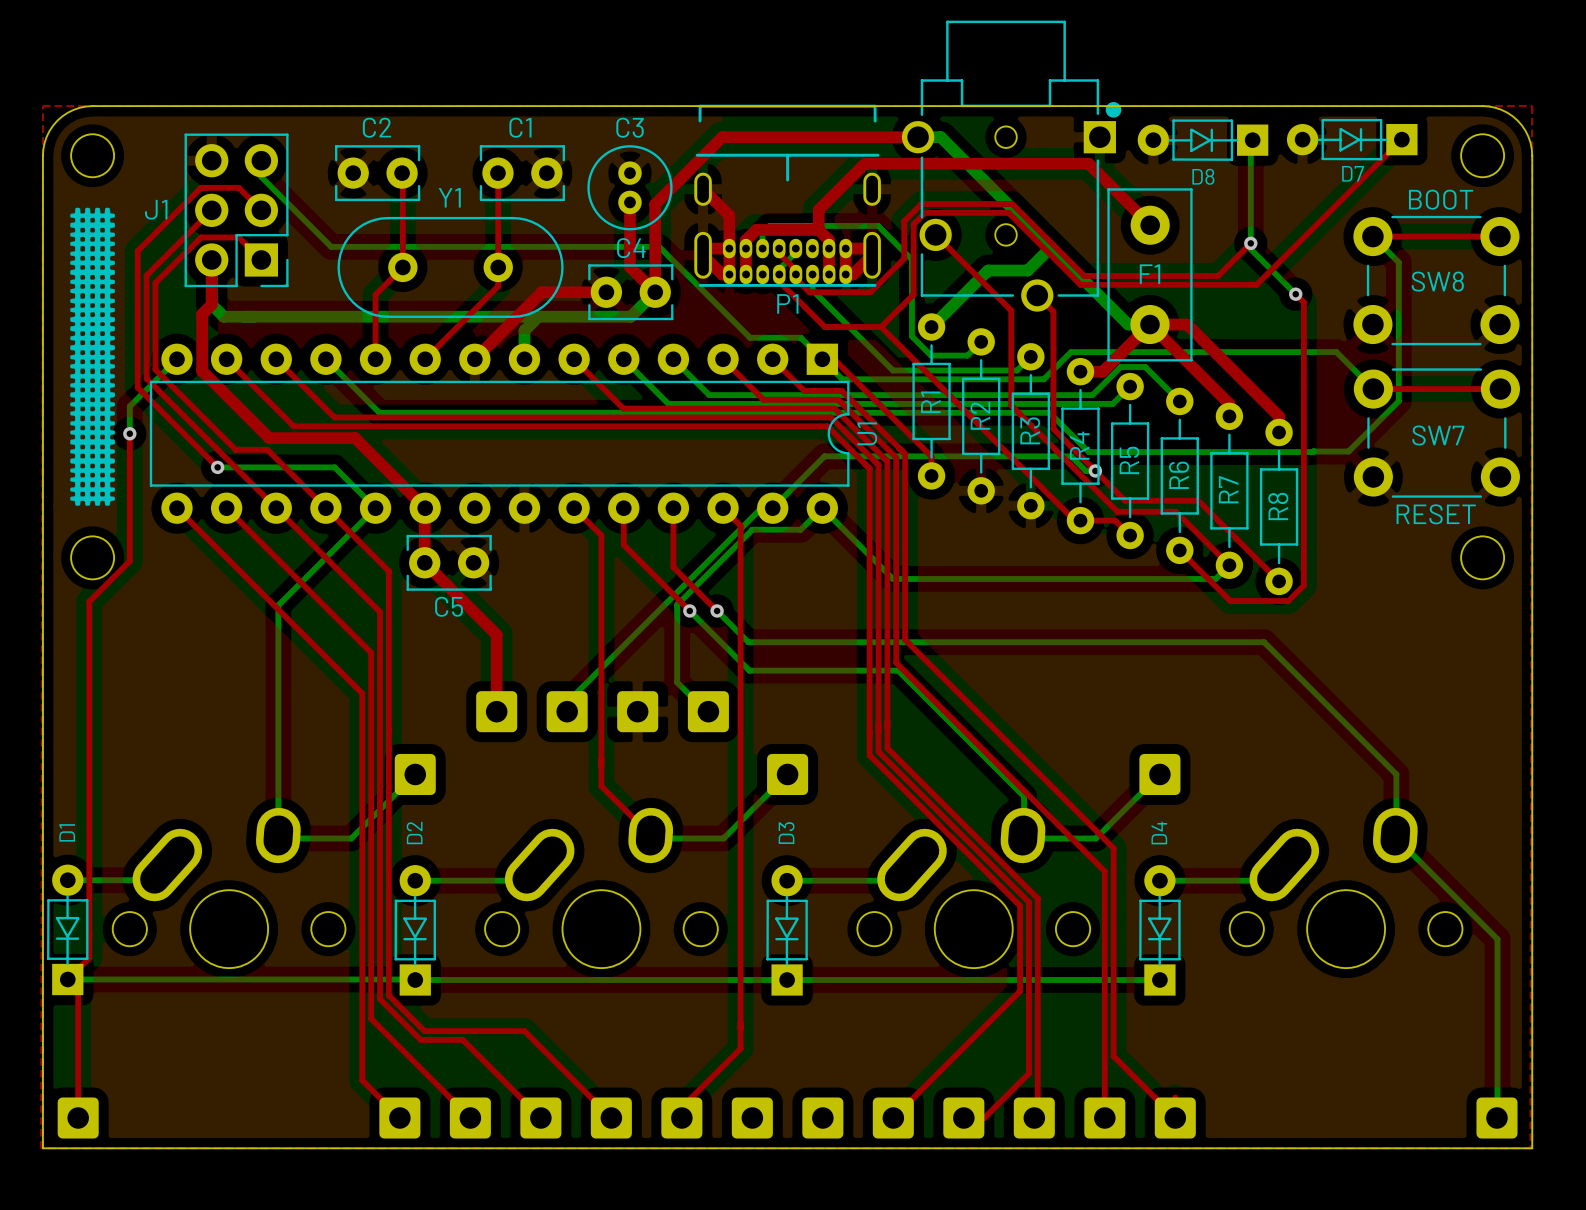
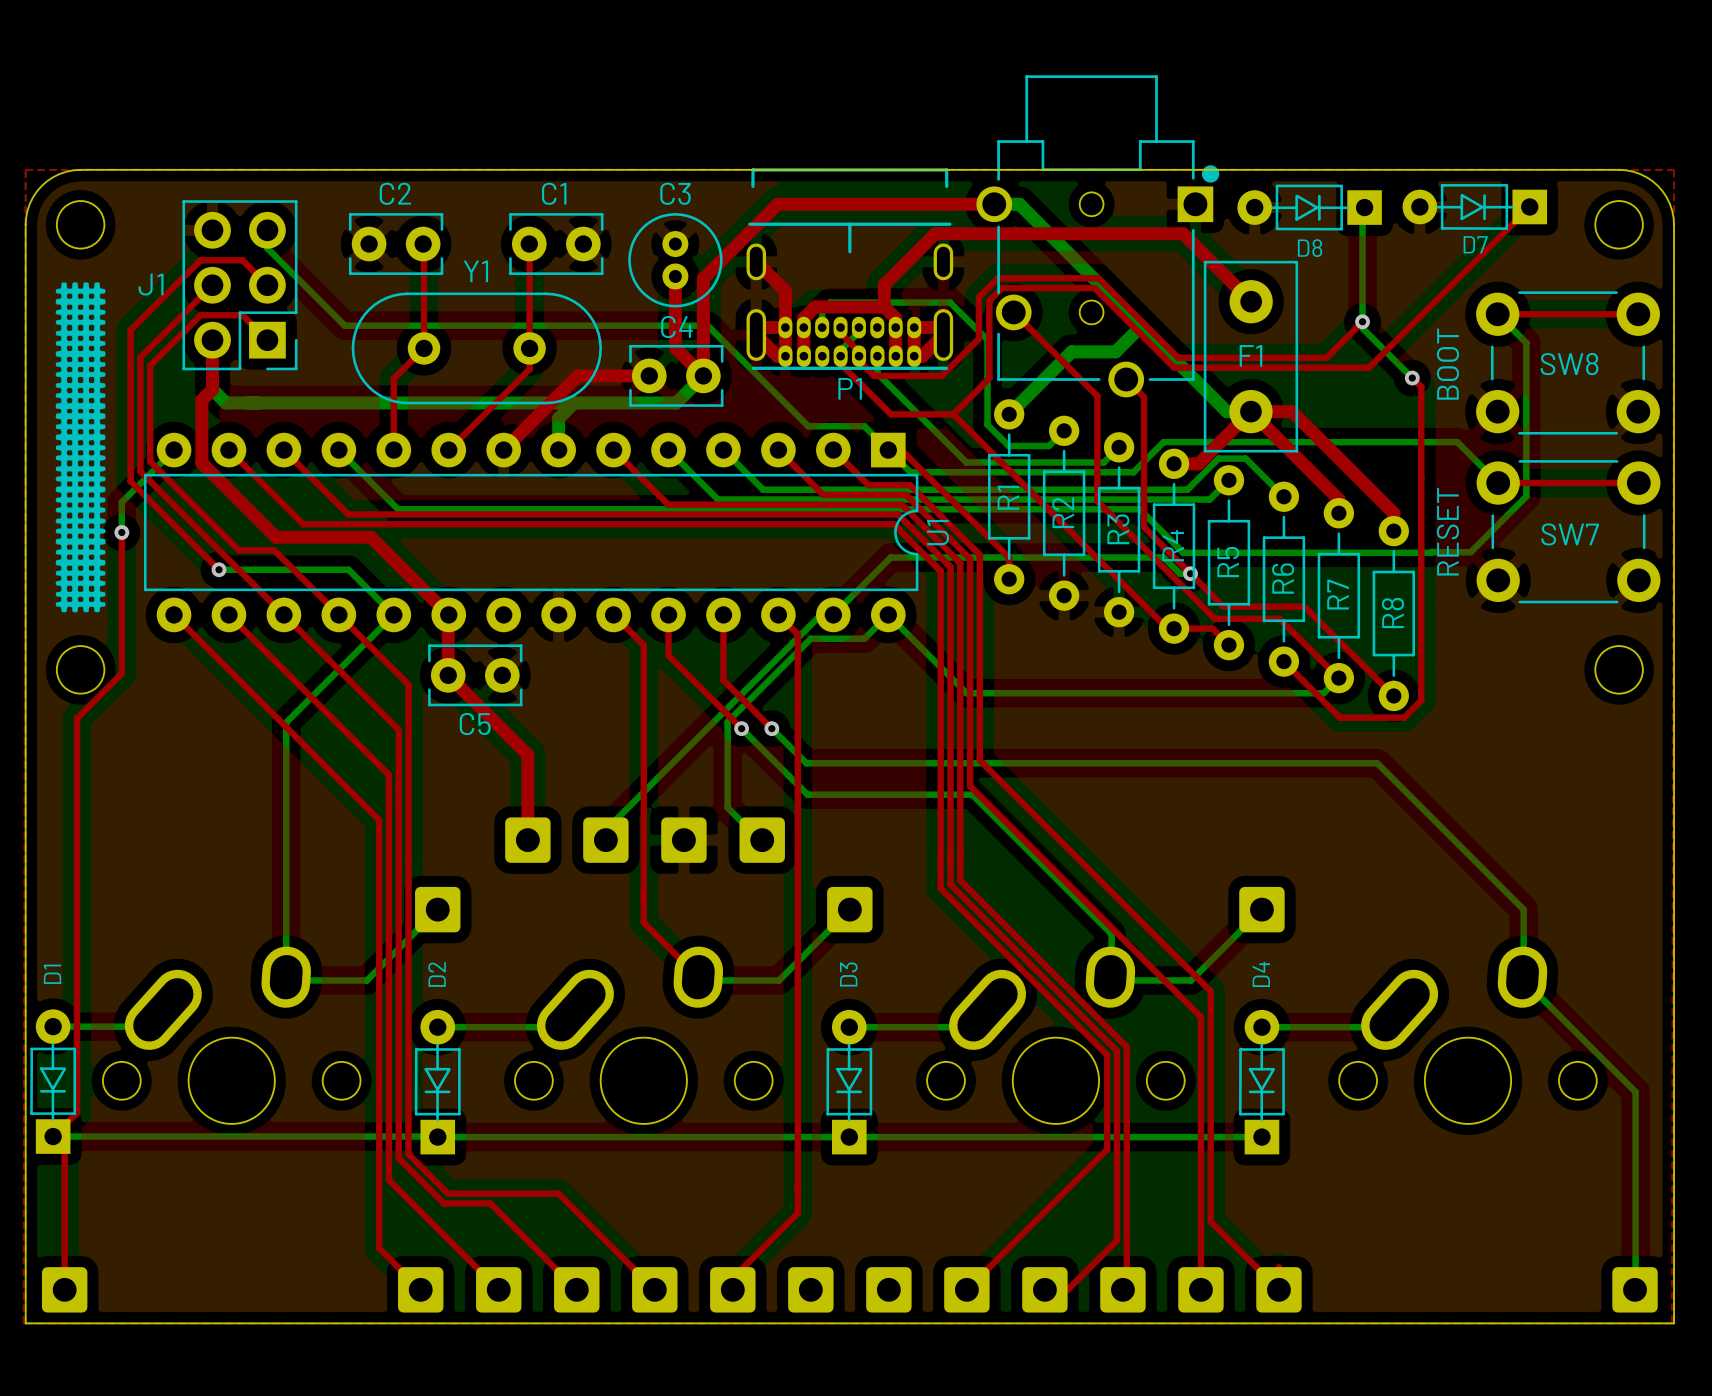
text rotation: 0° (1441, 199) -> 90° counterclockwise (1447, 364)
text position: BOOT (1441, 199) -> BOOT (1447, 364)
text rotation: 0° (1436, 514) -> 90° counterclockwise (1447, 531)
text position: RESET (1436, 514) -> RESET (1447, 531)

